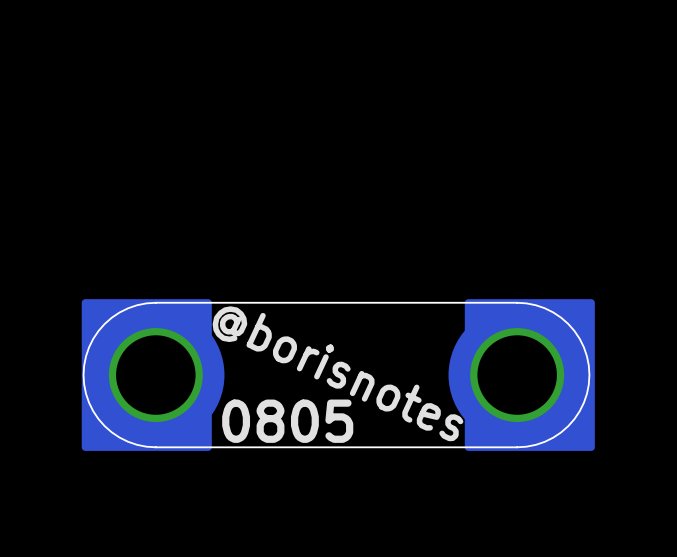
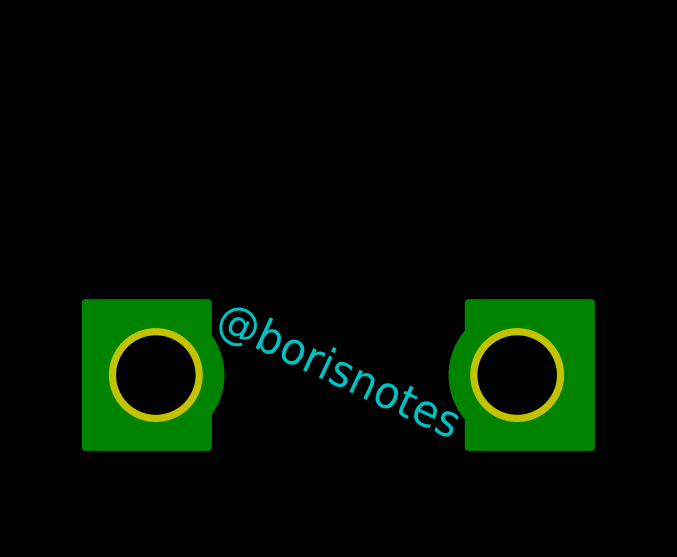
board edge: (517, 302) (155, 302) (137, 305) (111, 317) (93, 338) (84, 365) (86, 393) (93, 411) (104, 426) (119, 437) (146, 446) (517, 447) (535, 444) (553, 437) (574, 419) (586, 393) (588, 365) (583, 347) (568, 323) (544, 308) (517, 302) -> none
text: 0805 (287, 421) -> none

